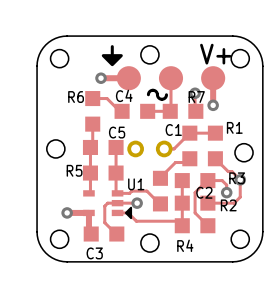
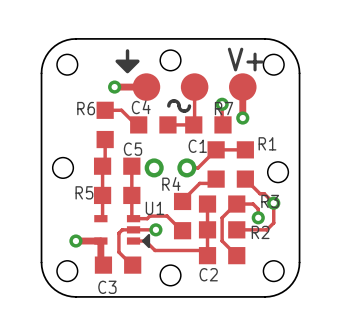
C2 name position: C2 (204, 192) -> C2 (208, 274)
R4 name position: R4 (185, 245) -> R4 (171, 183)

